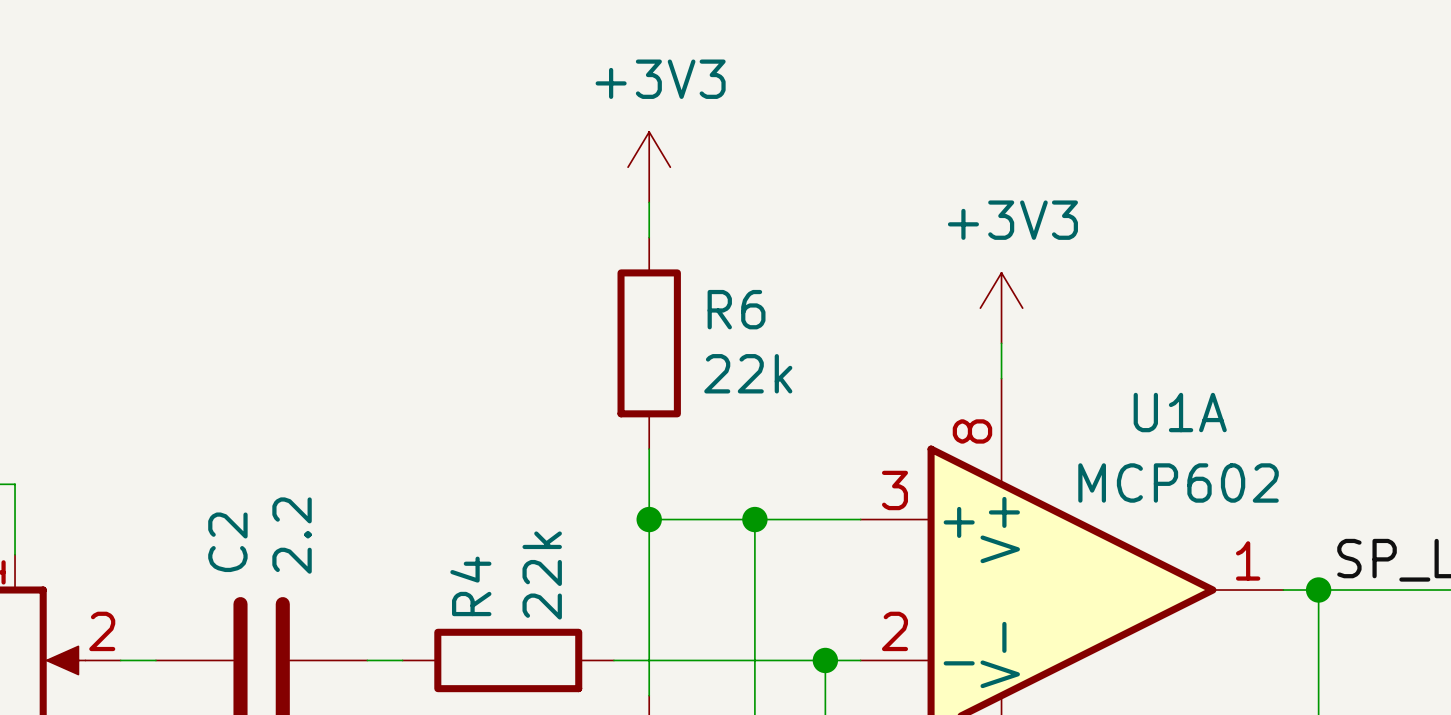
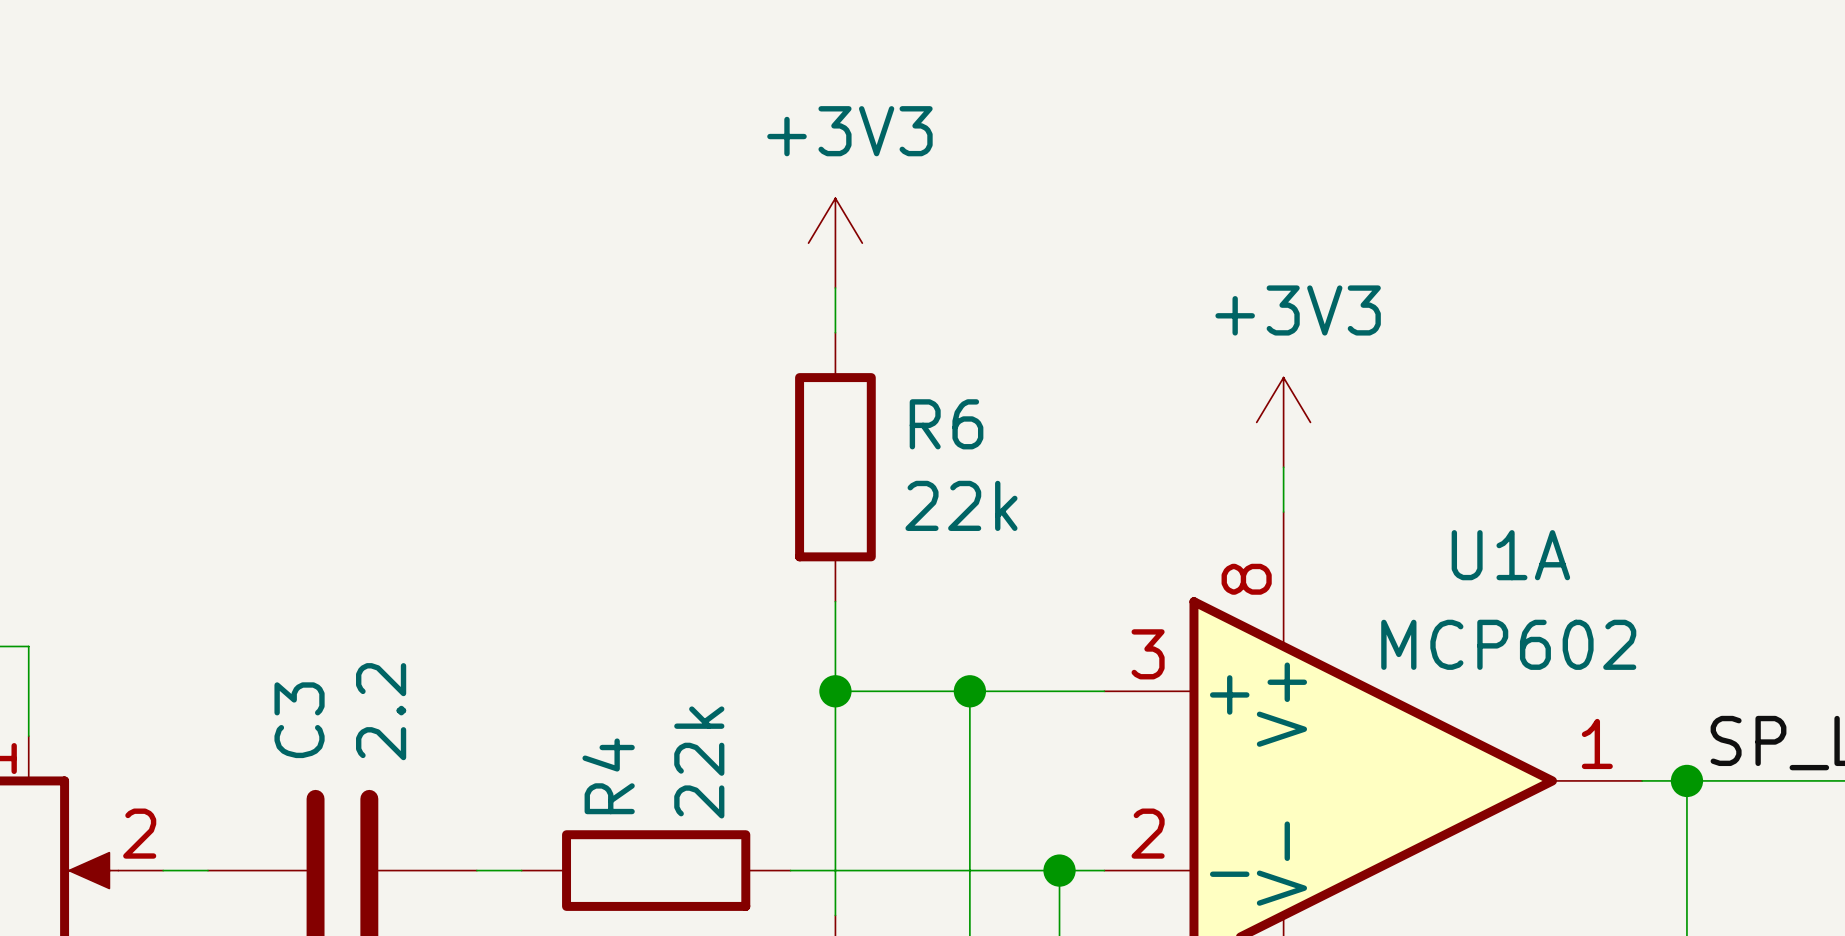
C2 name: C2 (227, 542) -> C3 (299, 720)

